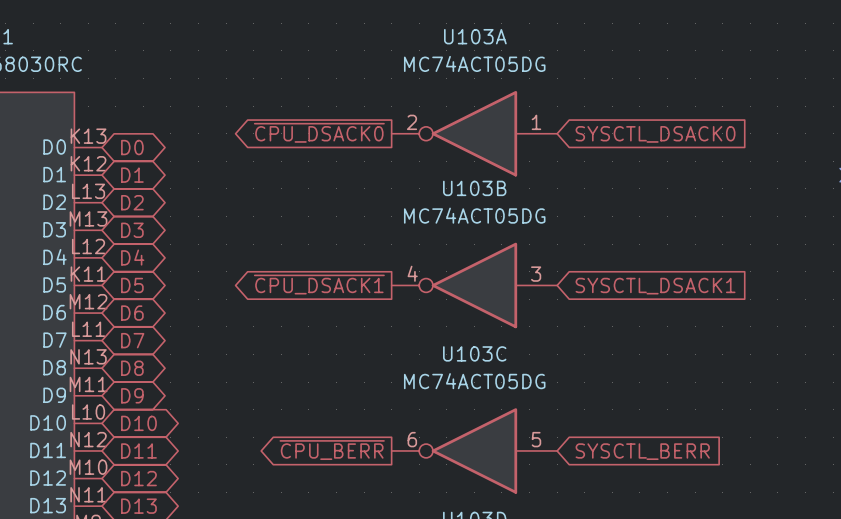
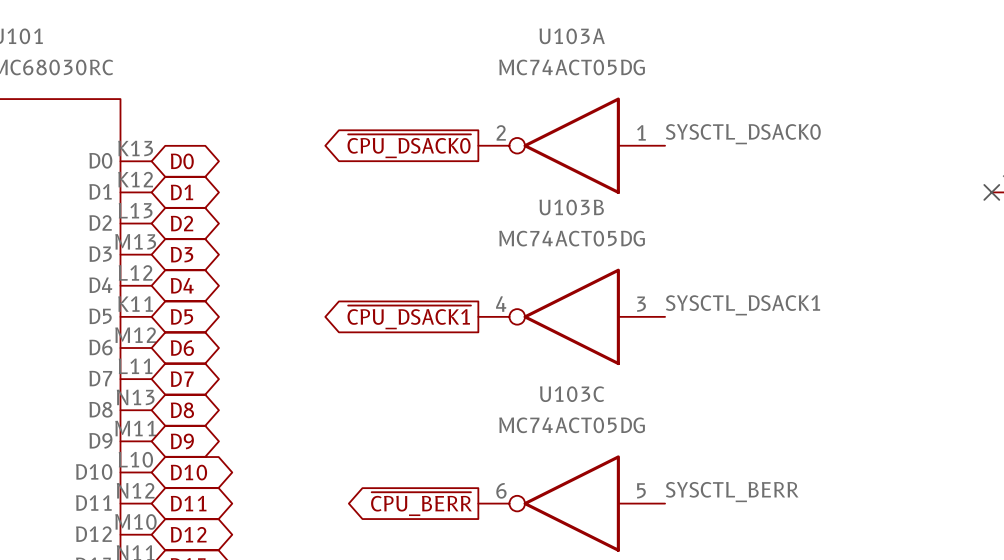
label: none -> SYSCTL_DSACK0 (743, 134)
global label: SYSCTL_DSACK0 (655, 134) -> none
label: none -> SYSCTL_DSACK1 (743, 305)
global label: SYSCTL_DSACK1 (655, 286) -> none
label: none -> SYSCTL_BERR (732, 492)
global label: SYSCTL_BERR (642, 451) -> none

